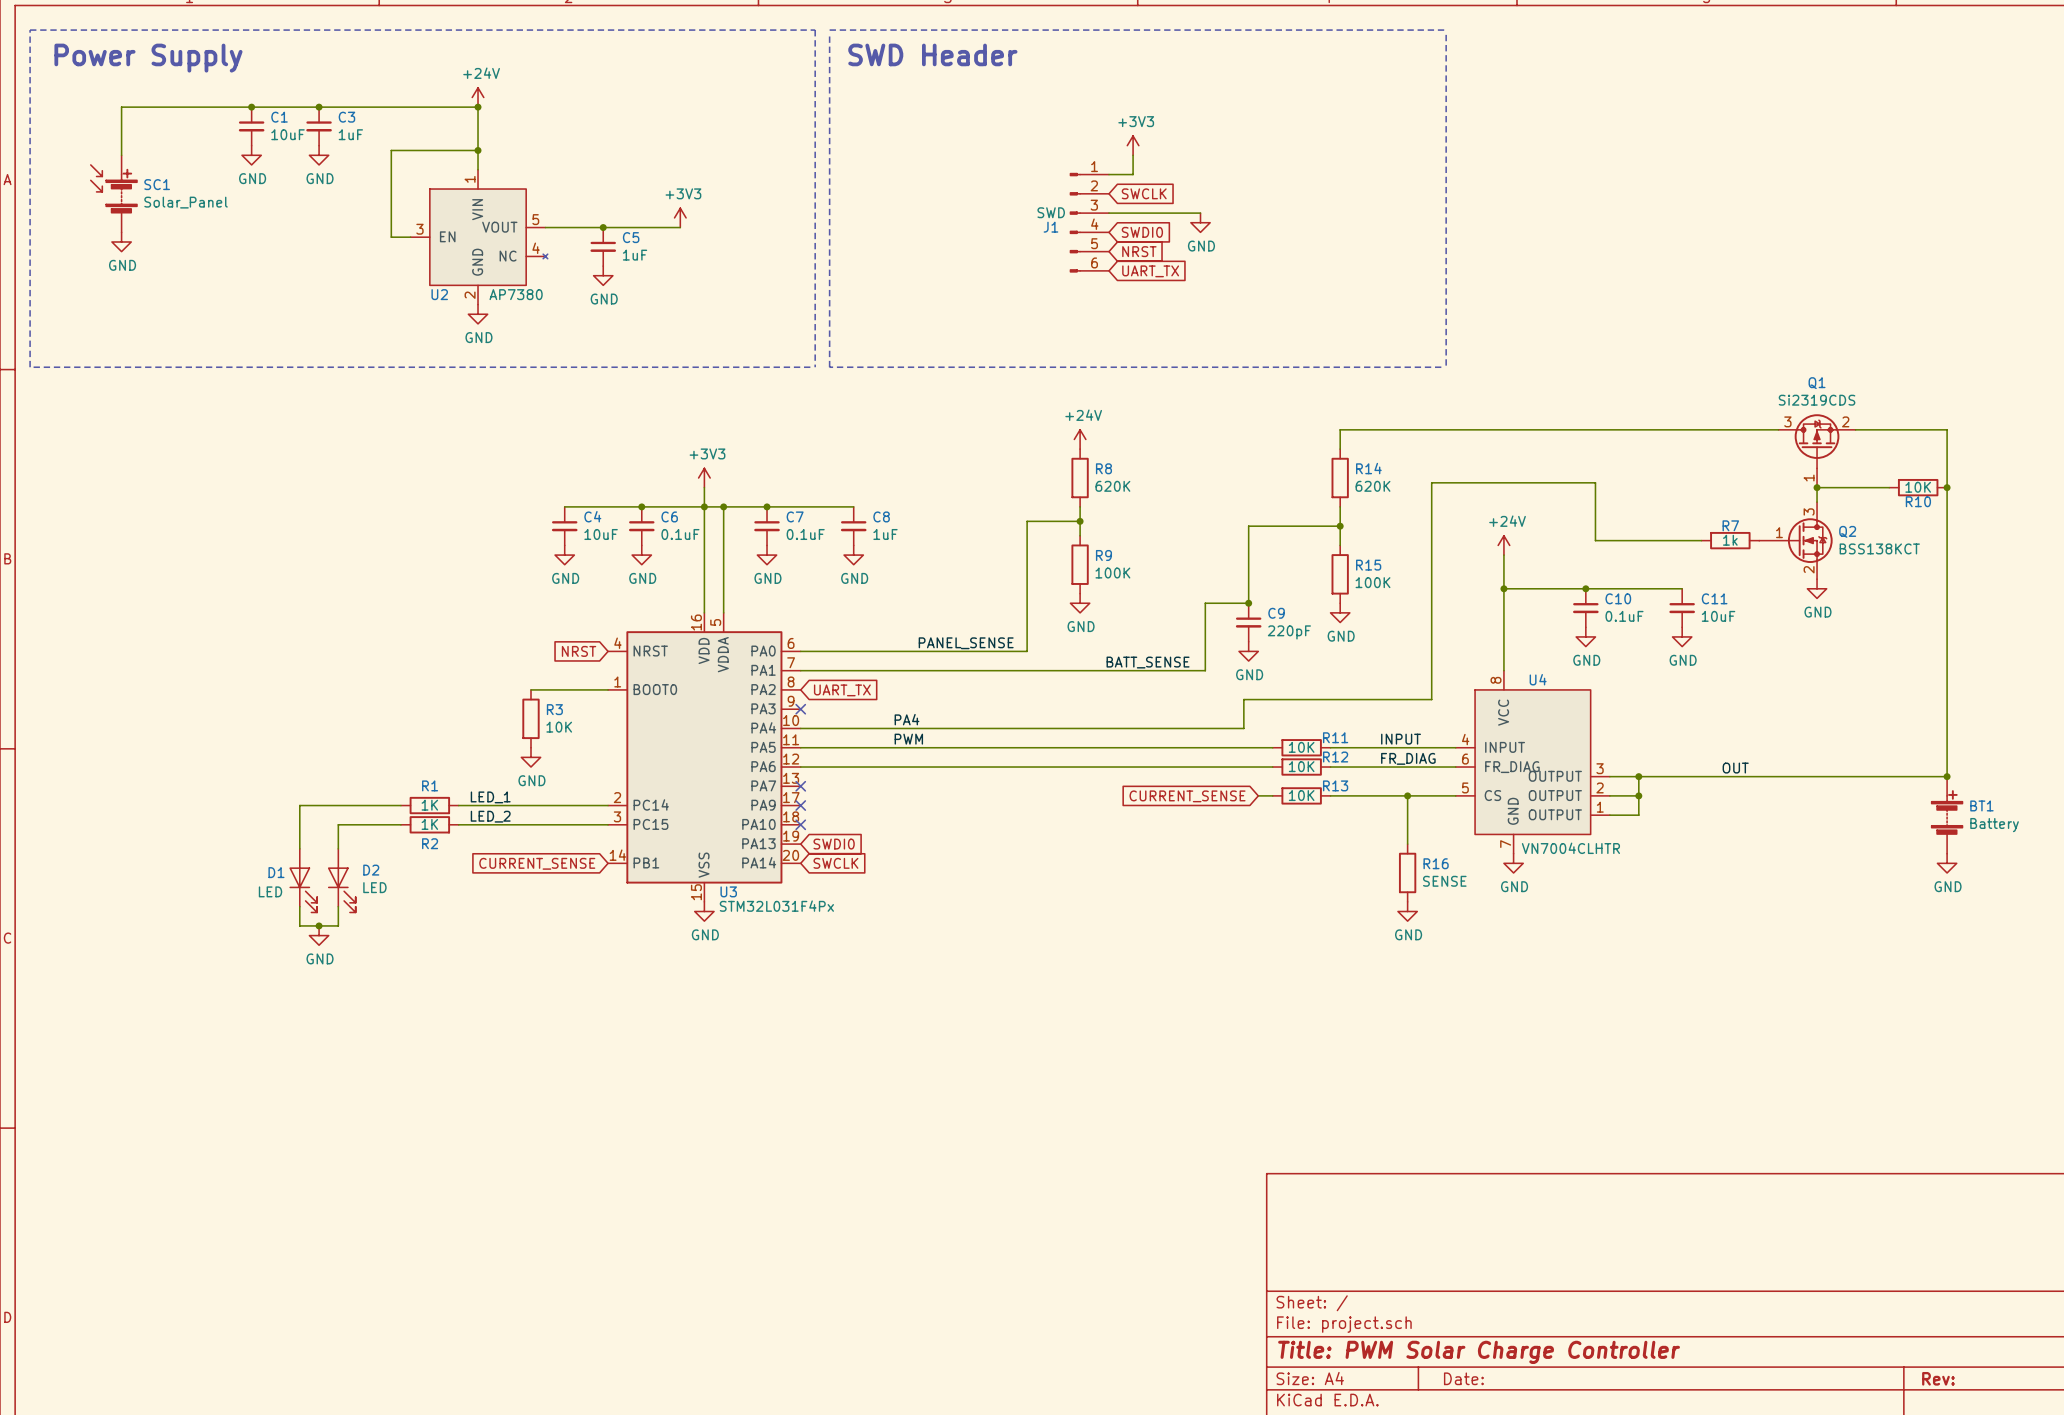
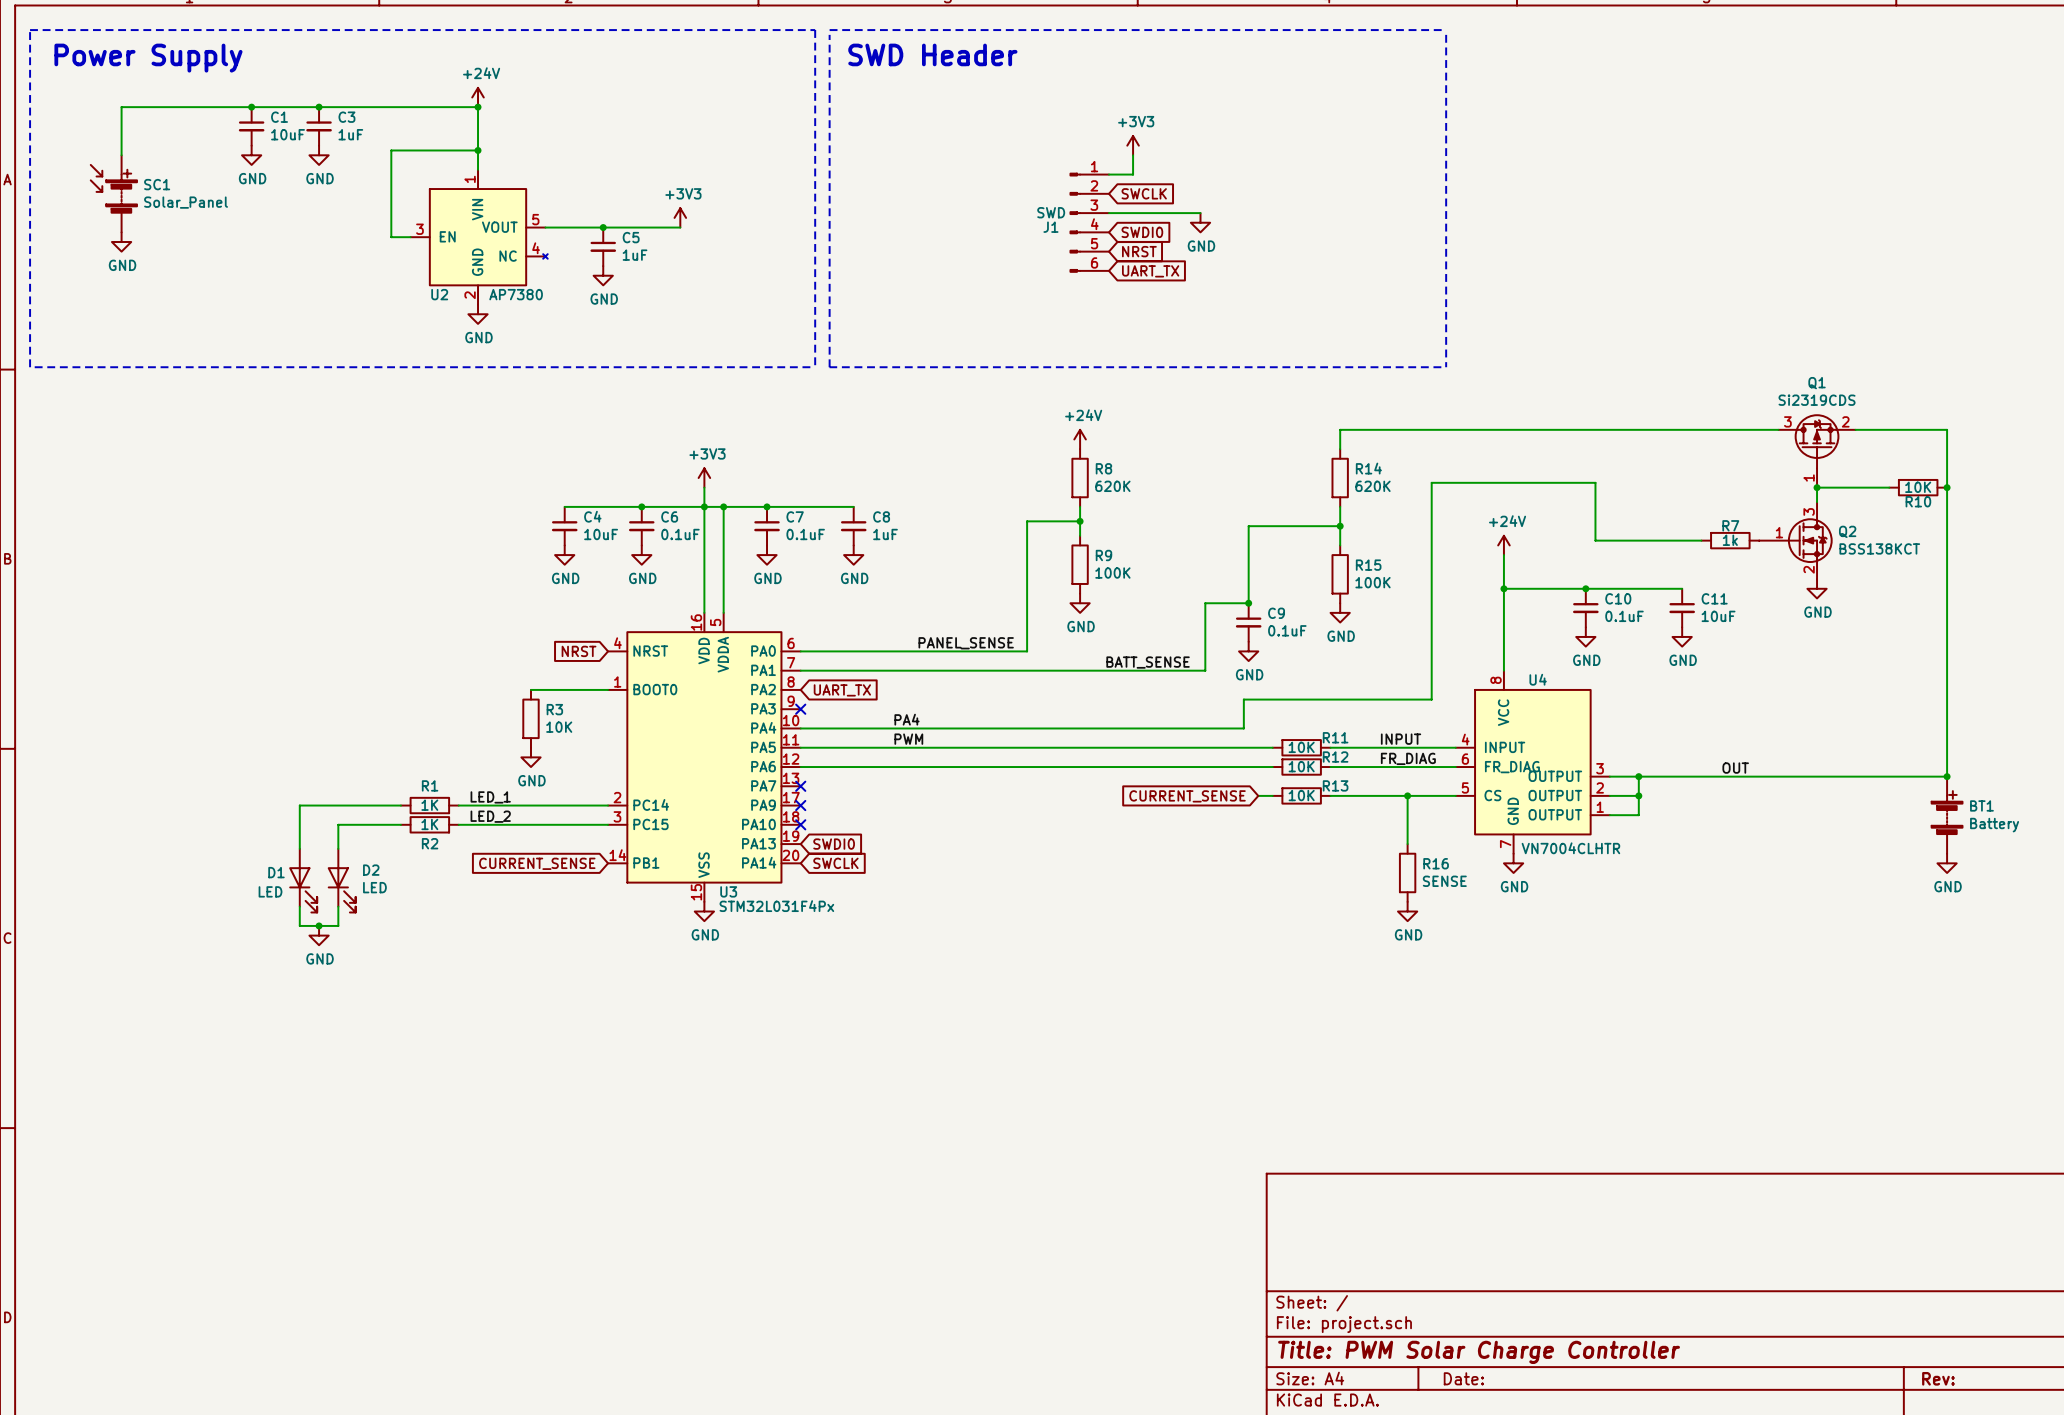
C9 value: 220pF (1289, 632) -> 0.1uF (1287, 630)

